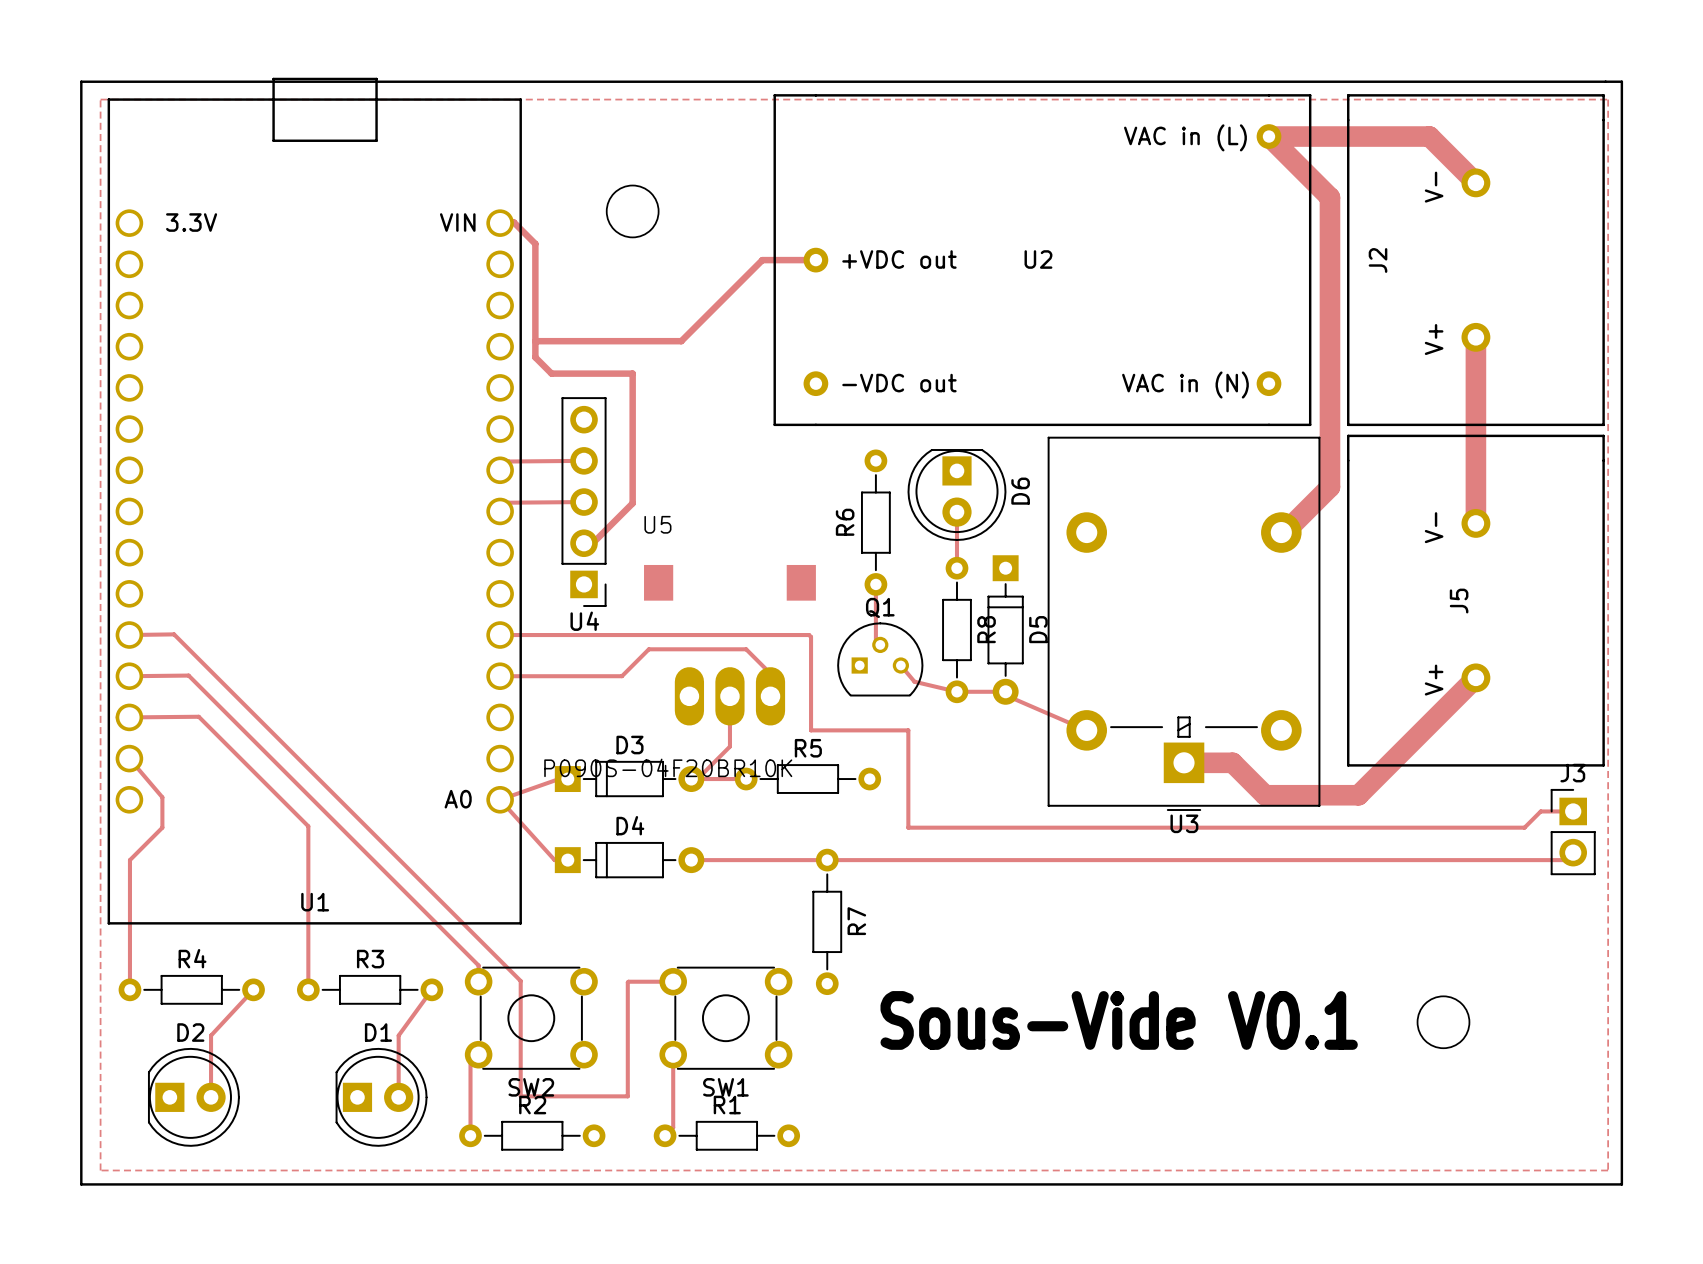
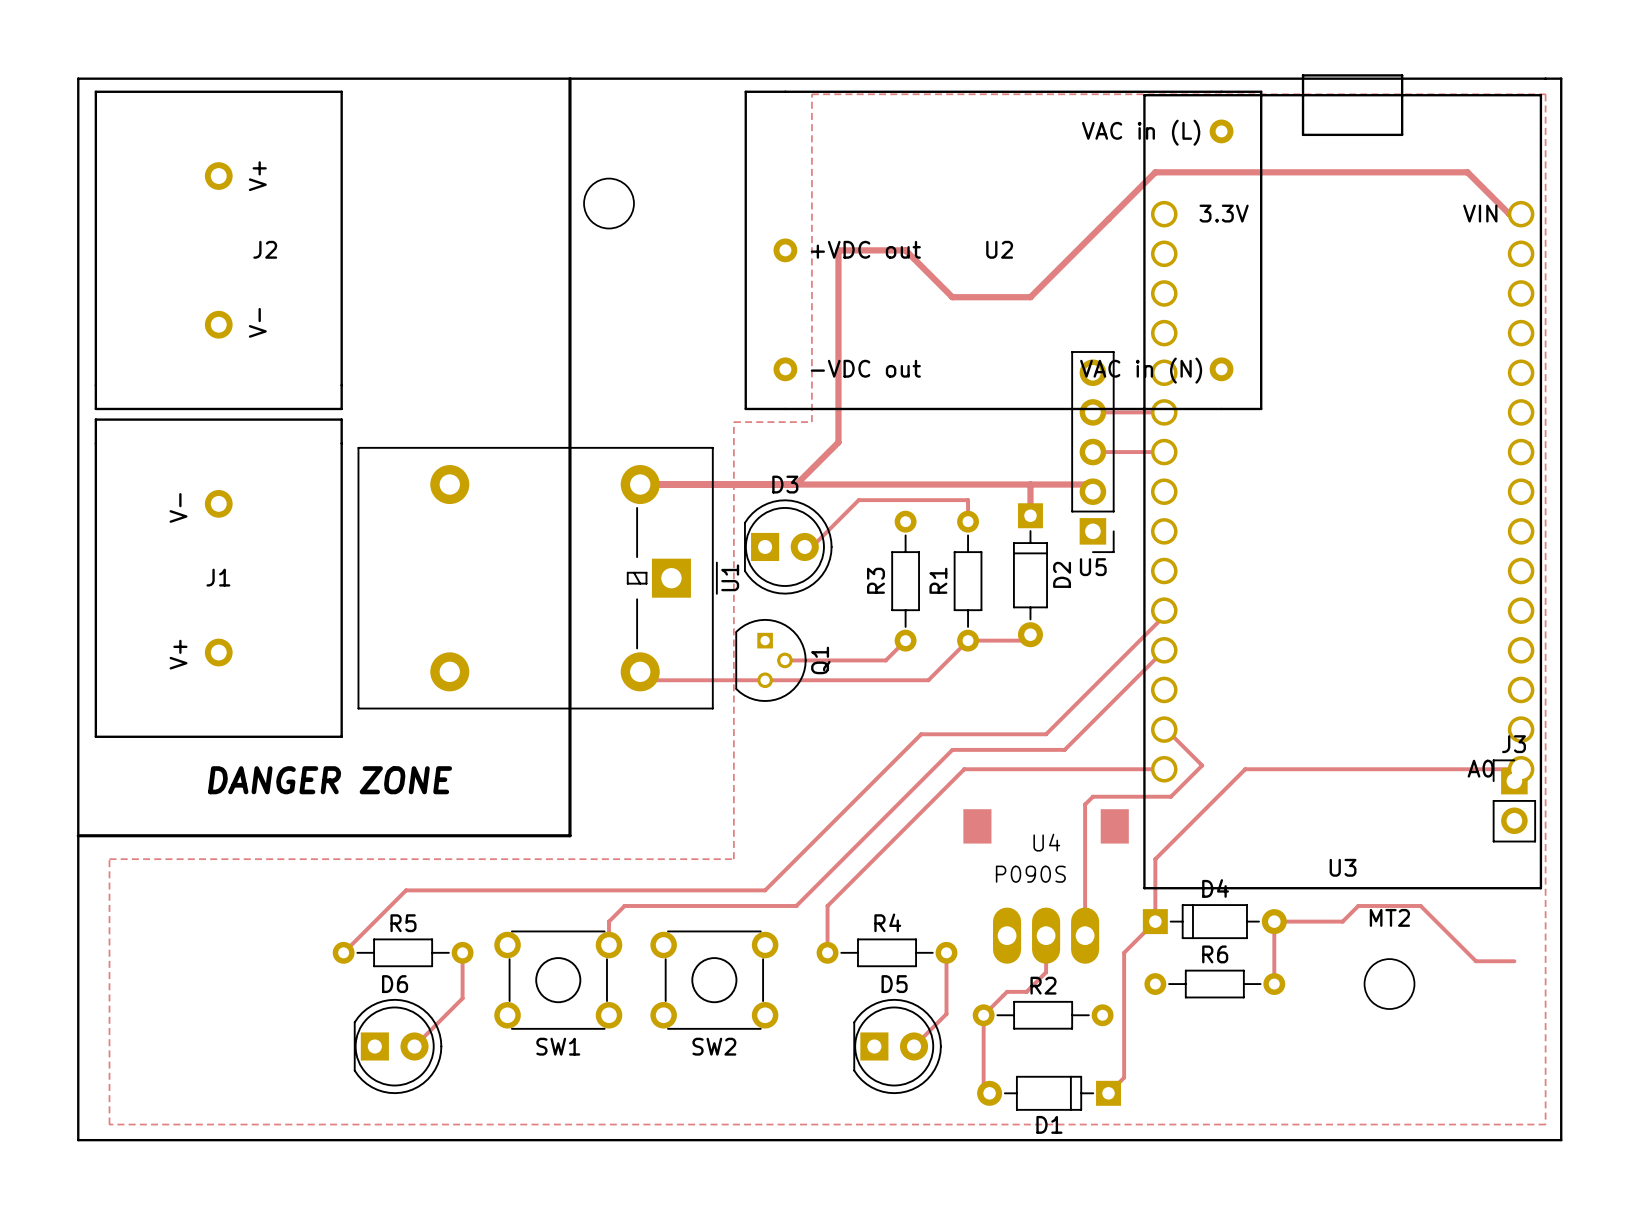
U1 footprint: [107, 77, 522, 925] -> [357, 446, 718, 710]
line: none -> (569, 78) (569, 835) (78, 835)
zone outline: (100, 99) (100, 1170) (1608, 1170) (1608, 99) (100, 99) -> (811, 94) (811, 422) (733, 422) (733, 859) (109, 859) (109, 1124) (1545, 1124) (1545, 94) (811, 94)
track: (1475, 182) (1429, 136) (1268, 136) (1329, 197) (1329, 487) (1284, 532) (1281, 532) -> none
track: none -> (1521, 214) (1509, 214) (1467, 172) (1155, 172) (1030, 297) (952, 297) (905, 250) (838, 250) (838, 442) (796, 484)
track: (500, 223) (513, 222) (535, 243) (535, 357) (551, 373) (632, 373) (632, 503) (592, 543) (584, 543) -> none
track: (815, 260) (762, 260) (681, 341) (535, 341) -> none
J2 name position: J2 (1378, 260) -> J2 (265, 249)
J2 rotation: 0° (1475, 260) -> 180° (218, 250)
J2 position: (1475, 260) -> (218, 250)
track: (1475, 337) (1475, 523) -> none
U4 footprint: [561, 397, 607, 607] -> [963, 809, 1129, 964]
track: none -> (1092, 412) (1164, 412)
U3 footprint: [1047, 436, 1321, 811] -> [1143, 74, 1543, 890]
track: (584, 460) (508, 461) (500, 470) -> none
track: none -> (1092, 452) (1164, 452)
D6 rotation: 0° (956, 495) -> 90° counterclockwise (398, 1046)
D6 position: (956, 495) -> (398, 1046)
track: (584, 502) (508, 502) (500, 511) -> none
track: none -> (640, 484) (1085, 484) (1092, 491)
track: none -> (1030, 484) (1030, 515)
track: (956, 512) (956, 568) -> none
R6 rotation: 0° (875, 522) -> 90° clockwise (1214, 984)
R6 position: (875, 522) -> (1214, 984)
U5 name position: U5 (657, 524) -> U5 (1093, 567)
track: none -> (968, 521) (968, 500) (858, 500) (811, 546) (804, 546)
D5 footprint: [987, 555, 1024, 705] -> [853, 998, 942, 1095]
U5 footprint: [644, 564, 816, 726] -> [1071, 351, 1115, 554]
track: (875, 584) (875, 640) (880, 644) -> none
J1: none -> (218, 578)
J5: (1475, 600) -> none
U4 name position: U4 (584, 621) -> U4 (1046, 842)
D5 name position: D5 (1038, 629) -> D5 (894, 984)
R8: (956, 630) -> none
track: none -> (1164, 610) (1164, 616) (1046, 734) (921, 734) (765, 890) (406, 890) (343, 952)
track: (129, 640) (129, 635) (174, 634) (520, 981) (520, 1096) (627, 1096) (627, 982) (673, 981) -> none
track: (500, 640) (500, 635) (809, 635) (811, 636) (811, 730) (908, 730) (908, 827) (1135, 827) -> (1085, 951) (1085, 804) (1092, 796)
Q1 rotation: 0° (880, 659) -> 90° clockwise (770, 660)
Q1 position: (880, 659) -> (770, 660)
track: (900, 665) (914, 681) (956, 691) (1005, 691) (1011, 697) (1086, 730) -> none
track: none -> (905, 640) (885, 660) (784, 660) (789, 656)
track: none -> (1036, 640) (1030, 634) (1024, 640) (968, 640) (928, 680) (648, 680) (640, 671)
track: none -> (1164, 650) (1064, 749) (952, 749) (796, 906) (624, 906) (609, 921) (609, 945)
track: (129, 676) (188, 675) (478, 965) (478, 981) -> none
track: (500, 676) (621, 676) (648, 649) (746, 649) (770, 673) (770, 696) -> none
track: (1475, 677) (1358, 795) (1265, 795) (1232, 762) (1184, 762) -> none
track: (729, 696) (729, 746) (697, 779) -> none
track: (129, 717) (198, 716) (308, 826) (308, 989) -> none
D3 footprint: [554, 760, 705, 798] -> [744, 499, 833, 595]
track: (124, 763) (129, 758) (162, 797) (162, 827) (129, 860) (129, 989) -> none
U5 value: P090S-04F20BR10K (668, 767) -> none
track: (567, 779) (567, 775) (500, 799) (554, 860) (567, 860) -> none
track: (691, 779) (746, 779) -> none
R5 position: (807, 779) -> (403, 952)
track: none -> (1164, 769) (964, 769) (827, 906) (827, 952)
track: none -> (1521, 769) (1245, 769) (1155, 859) (1155, 921) (1124, 952) (1124, 1077) (1108, 1093) (1108, 1090)
text: none -> DANGER ZONE (330, 780)
track: (1573, 811) (1540, 811) (1524, 827) (1216, 827) -> (1159, 734) (1166, 729) (1202, 765) (1170, 796)
U3 name position: U3 (1184, 823) -> U3 (1343, 867)
track: (1573, 852) (1565, 860) (691, 860) -> none
D4 position: (629, 860) -> (1214, 921)
U1 name position: U1 (315, 902) -> U1 (730, 577)
U4 value: none -> P090S (1030, 874)
R7: (827, 921) -> none
MT2 name: none -> MT2 (1389, 917)
R3 name position: R3 (370, 959) -> R3 (875, 580)
track: none -> (1046, 951) (1046, 972) (1026, 991) (1007, 991) (983, 1015)
R4 position: (191, 989) -> (887, 952)
track: (253, 989) (211, 1035) (211, 1097) -> none
R3 rotation: 0° (370, 989) -> 90° clockwise (905, 581)
R3 position: (370, 989) -> (905, 581)
track: (431, 989) (398, 1035) (398, 1097) -> none
track: none -> (462, 952) (462, 998) (414, 1046)
track: none -> (946, 952) (946, 1014) (914, 1046)
track: none -> (1514, 961) (1475, 961) (1420, 906) (1358, 906) (1342, 921) (1274, 921) (1274, 984)
SW2 position: (531, 1018) -> (714, 980)
SW1 position: (725, 1018) -> (558, 980)
text: Sous-Vide V0.1 (1119, 1020) -> none
D2 name position: D2 (190, 1032) -> D2 (1062, 574)
D1 name position: D1 (378, 1032) -> D1 (1049, 1124)
D2 footprint: [147, 1047, 240, 1147] -> [1012, 503, 1048, 648]
D1 footprint: [335, 1047, 428, 1147] -> [977, 1075, 1122, 1111]
track: (478, 1054) (470, 1062) (470, 1135) -> none
track: (673, 1054) (673, 1127) (665, 1135) -> none
track: none -> (983, 1015) (983, 1087) (989, 1093)
R1 name position: R1 (727, 1105) -> R1 (938, 580)
R2 position: (532, 1135) -> (1043, 1015)
R1 rotation: 0° (726, 1135) -> 90° clockwise (968, 581)
R1 position: (726, 1135) -> (968, 581)

